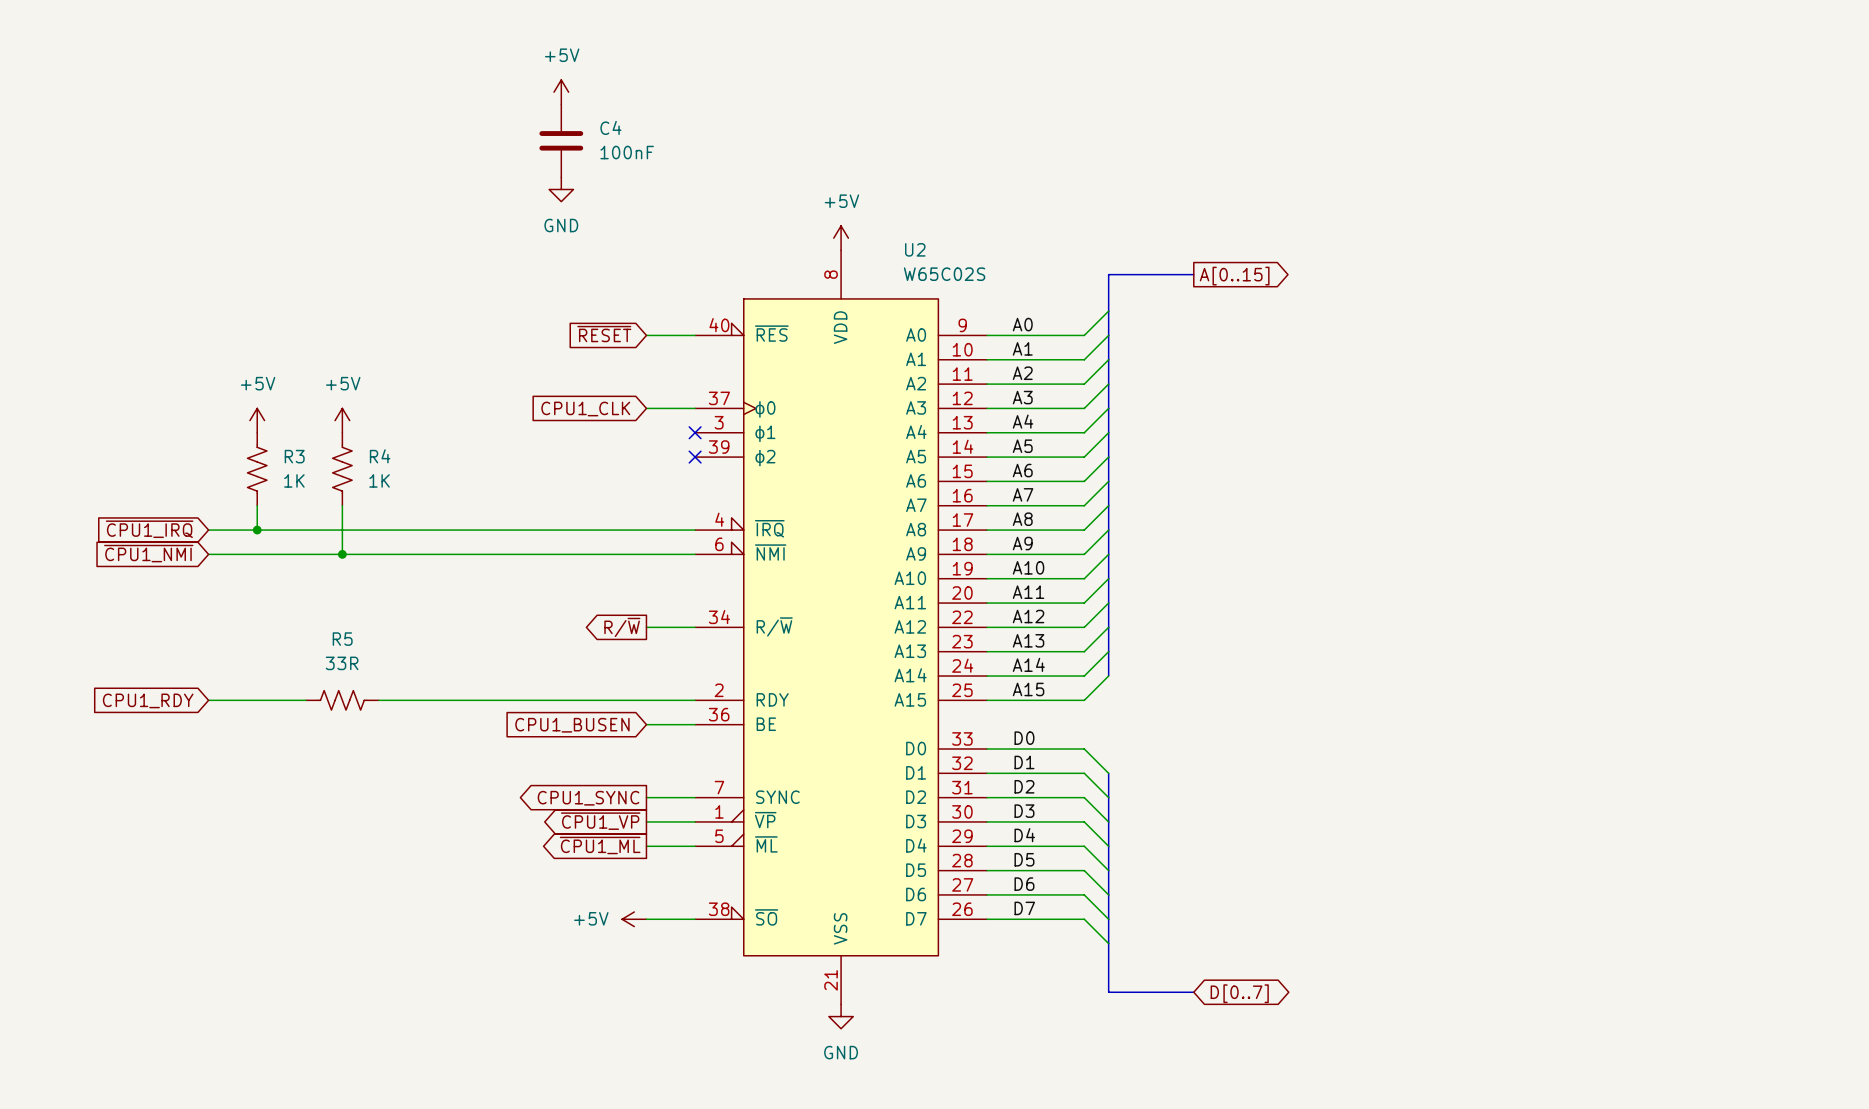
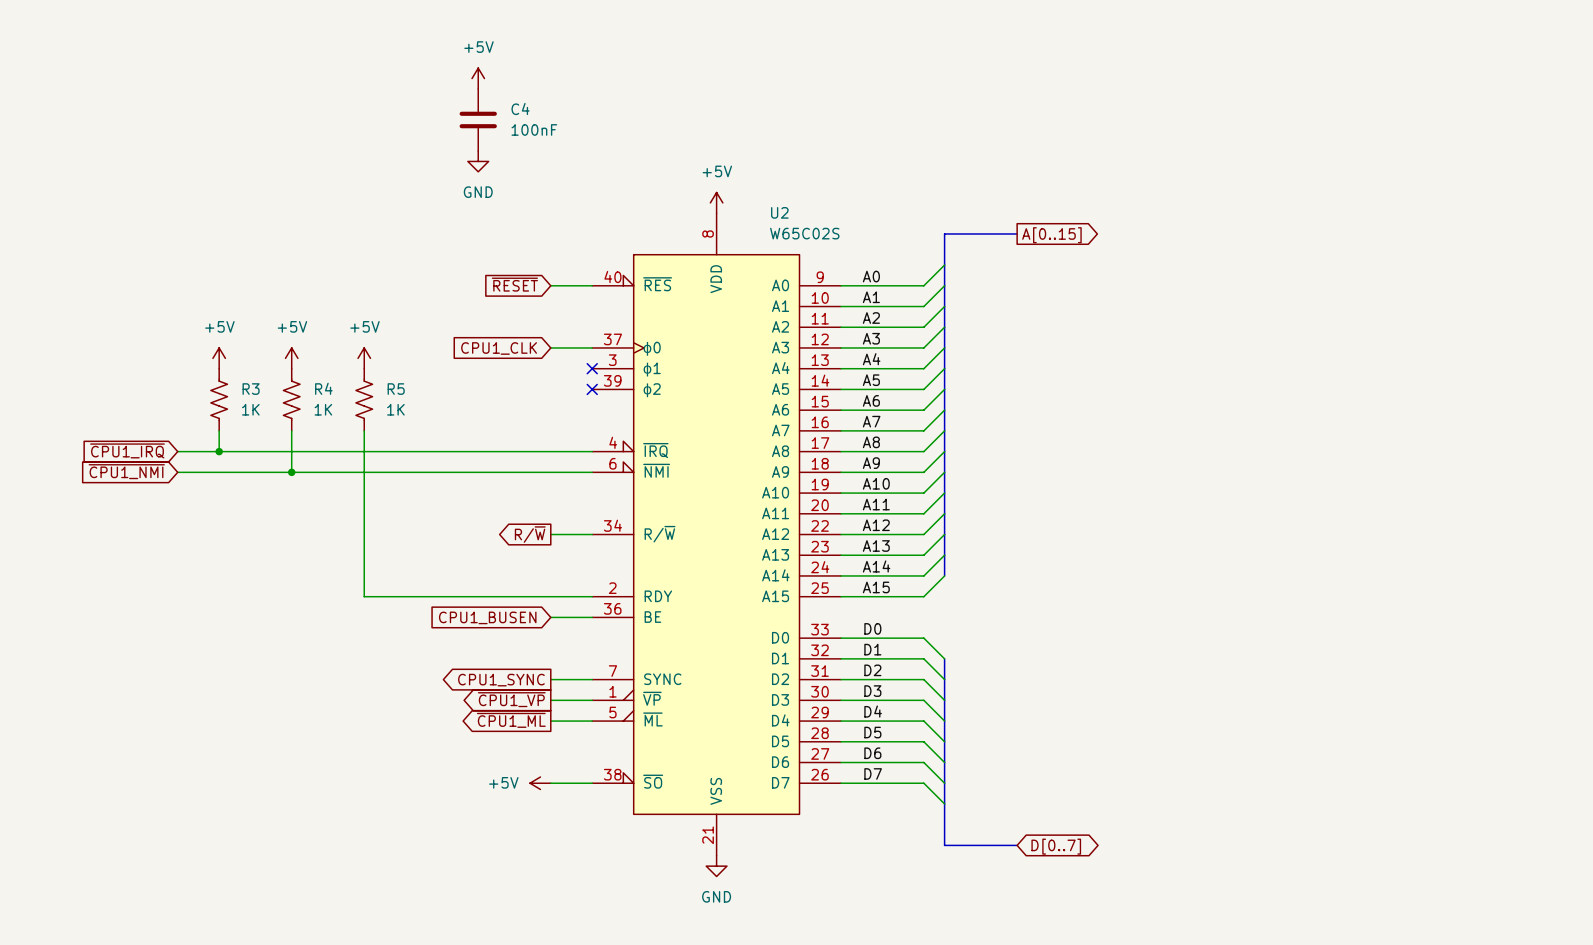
power symbol: none -> +5V (364, 358)
R5 name position: R5 (342, 639) -> R5 (396, 389)
R5 value: 33R (342, 663) -> 1K (395, 409)
global label: CPU1_RDY (148, 700) -> none
wire: (208, 700) (305, 700) -> none
R5 rotation: 0° (342, 700) -> 90° clockwise (364, 399)
R5 position: (342, 700) -> (364, 399)
wire: (378, 700) (427, 700) -> (364, 430) (364, 596)

